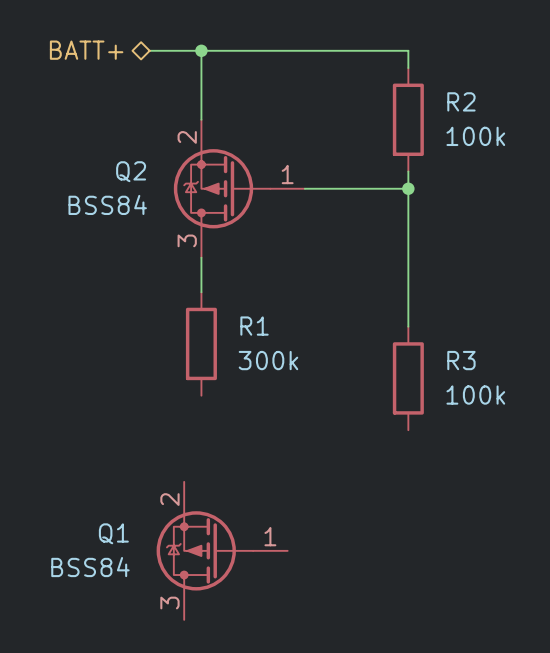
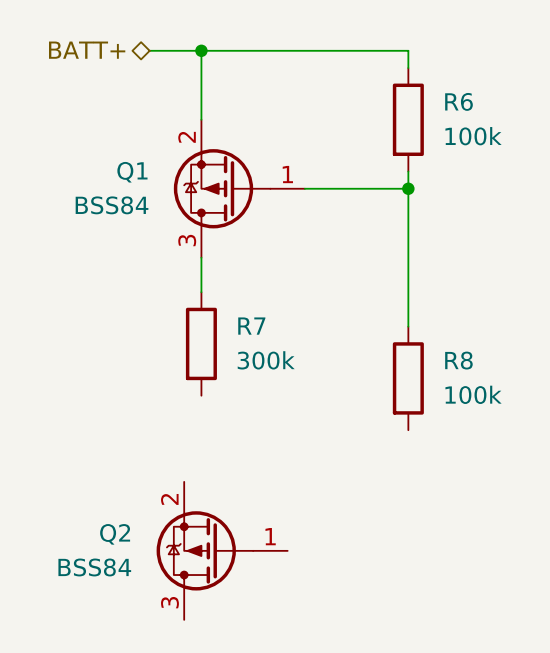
R2 name: R2 (461, 101) -> R6 (459, 101)
Q2 name: Q2 (131, 171) -> Q1 (132, 172)
R1 name: R1 (254, 326) -> R7 (251, 326)
R3 name: R3 (461, 360) -> R8 (458, 360)
Q1 name: Q1 (113, 533) -> Q2 (115, 534)

